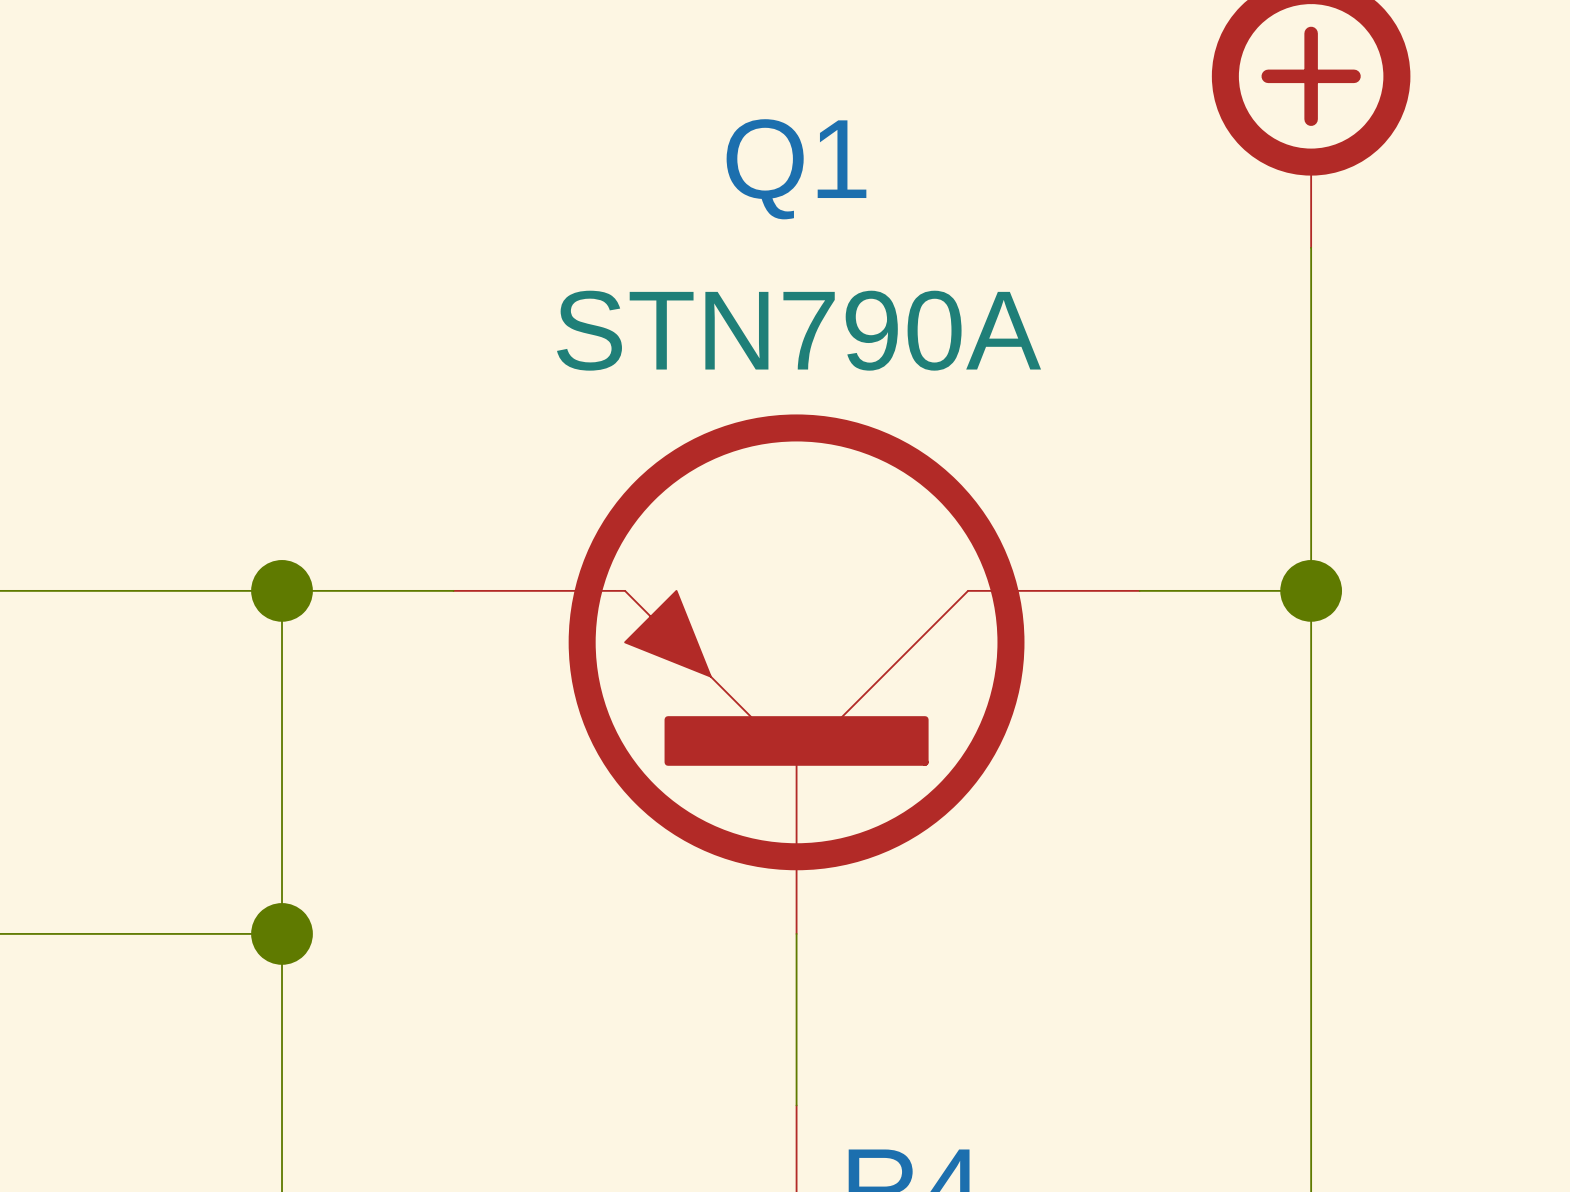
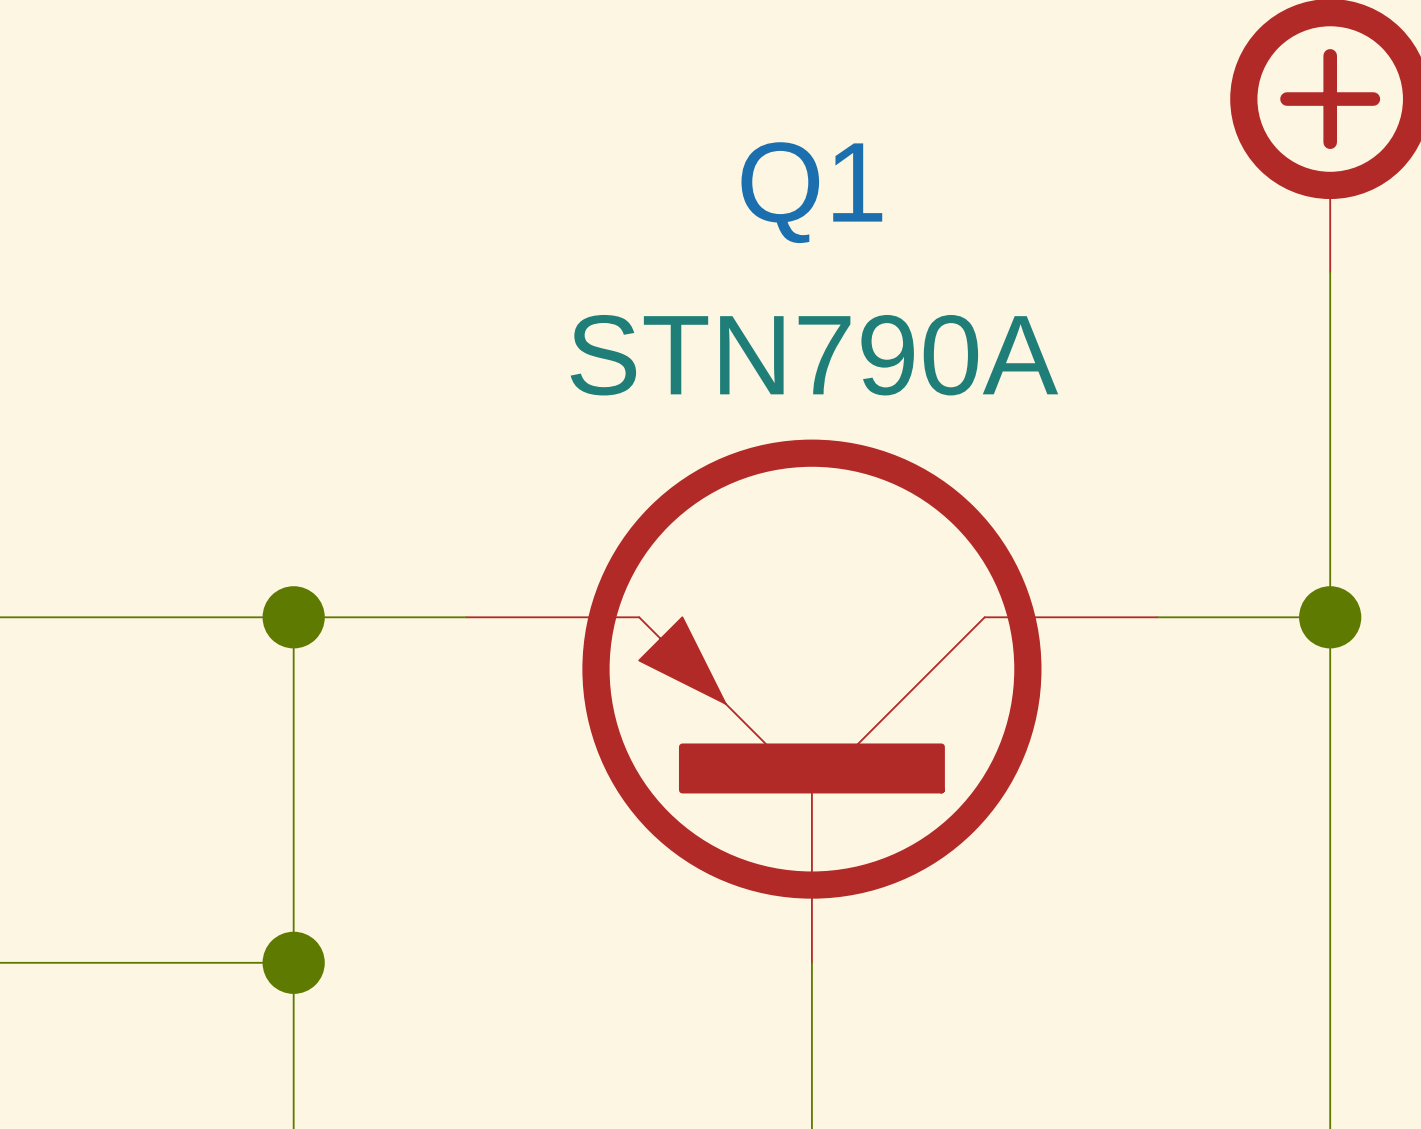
Q1 symbol: [453, 414, 1140, 934] -> [466, 439, 1158, 963]

